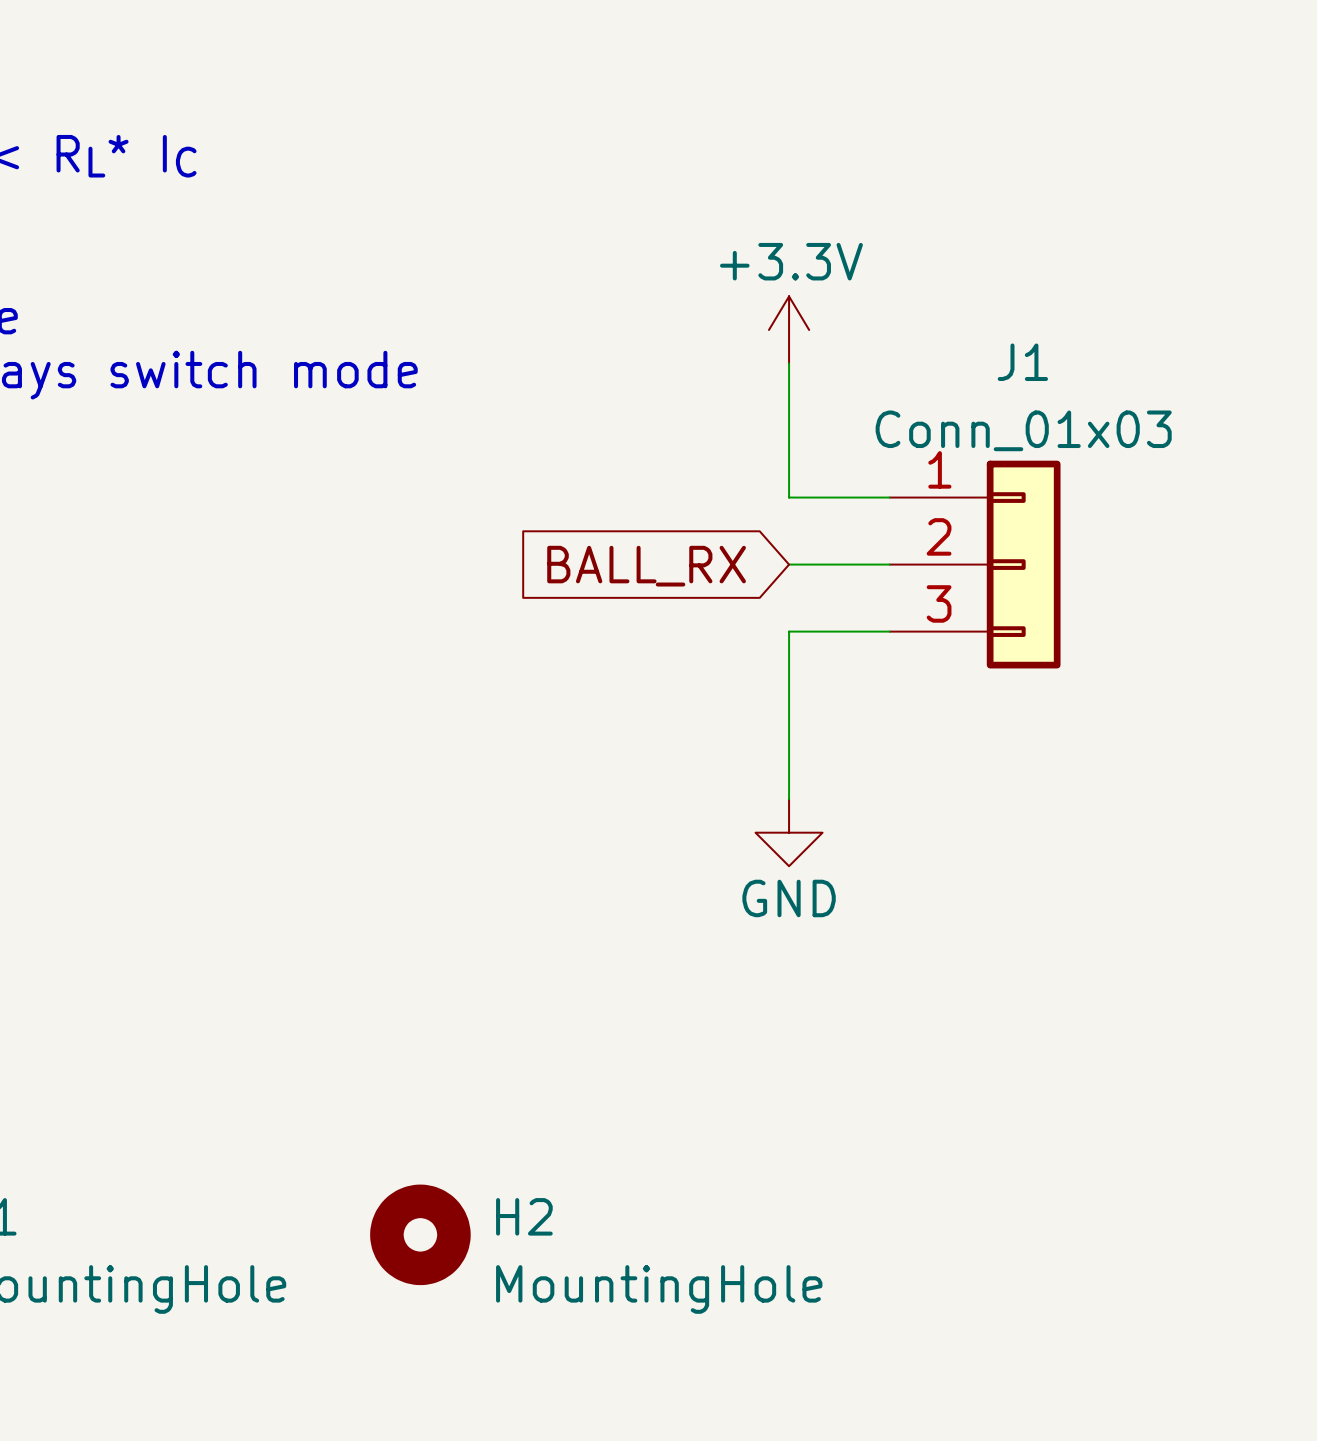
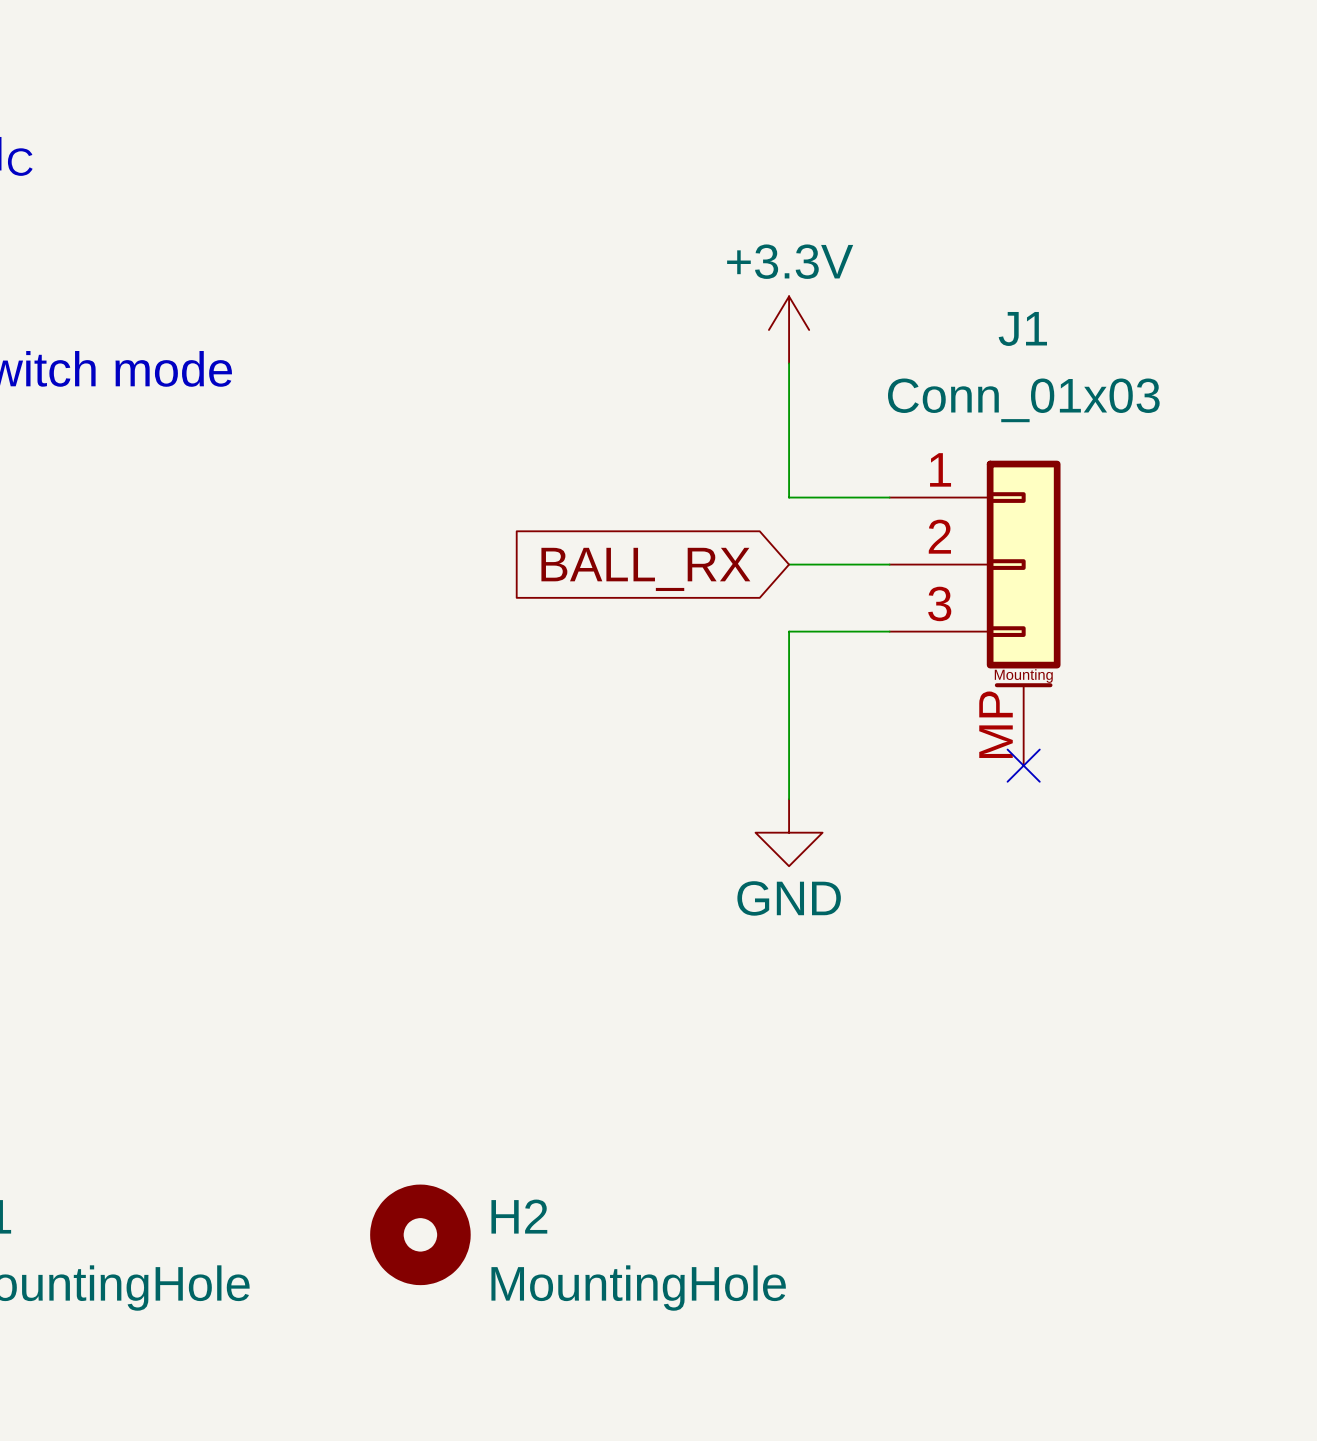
J1 name position: J1 (1022, 362) -> J1 (1022, 328)
J1 value position: Conn_01x03 (1023, 430) -> Conn_01x03 (1023, 400)
J1 symbol: [889, 460, 1061, 669] -> [889, 460, 1061, 766]
no-connect mark: none -> (1023, 765)

